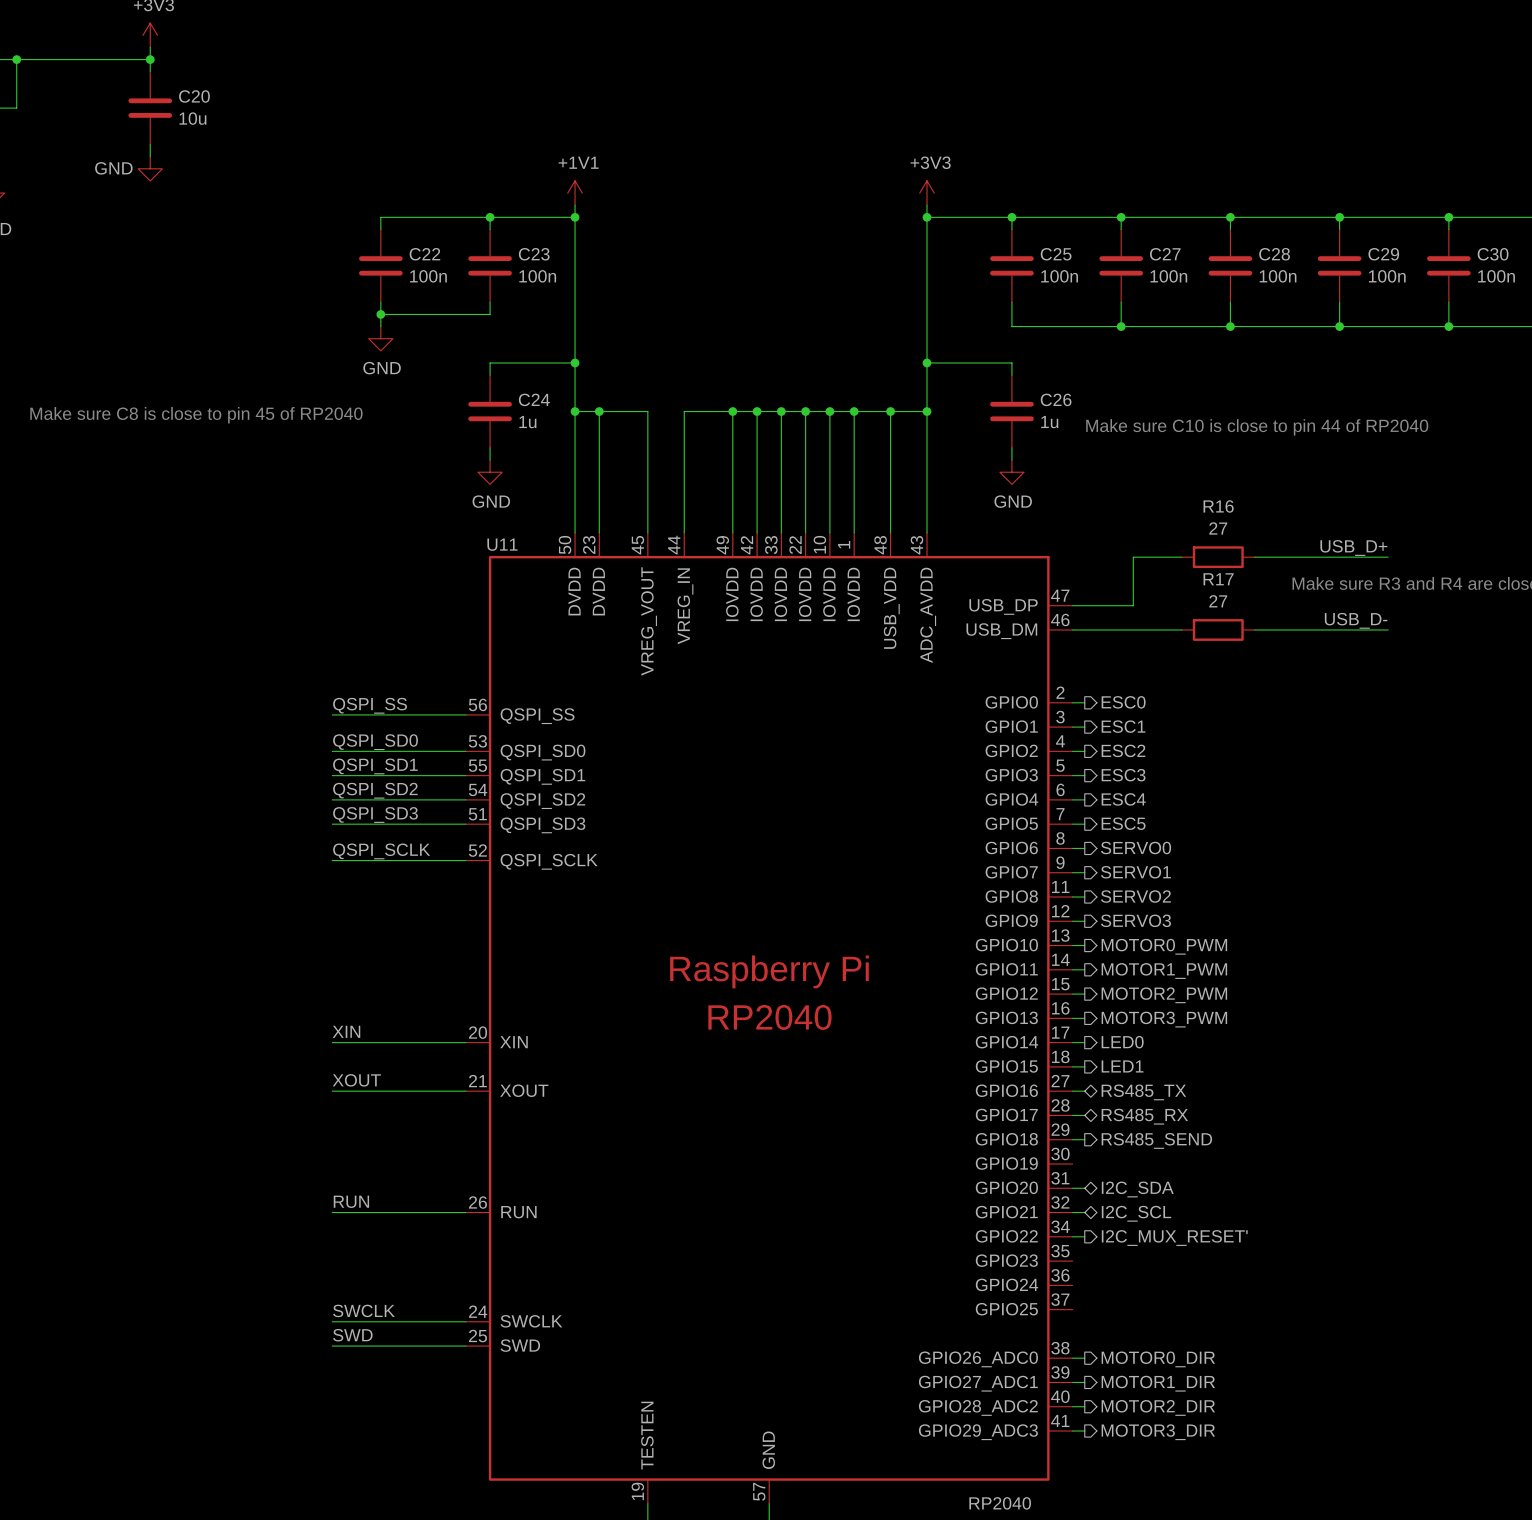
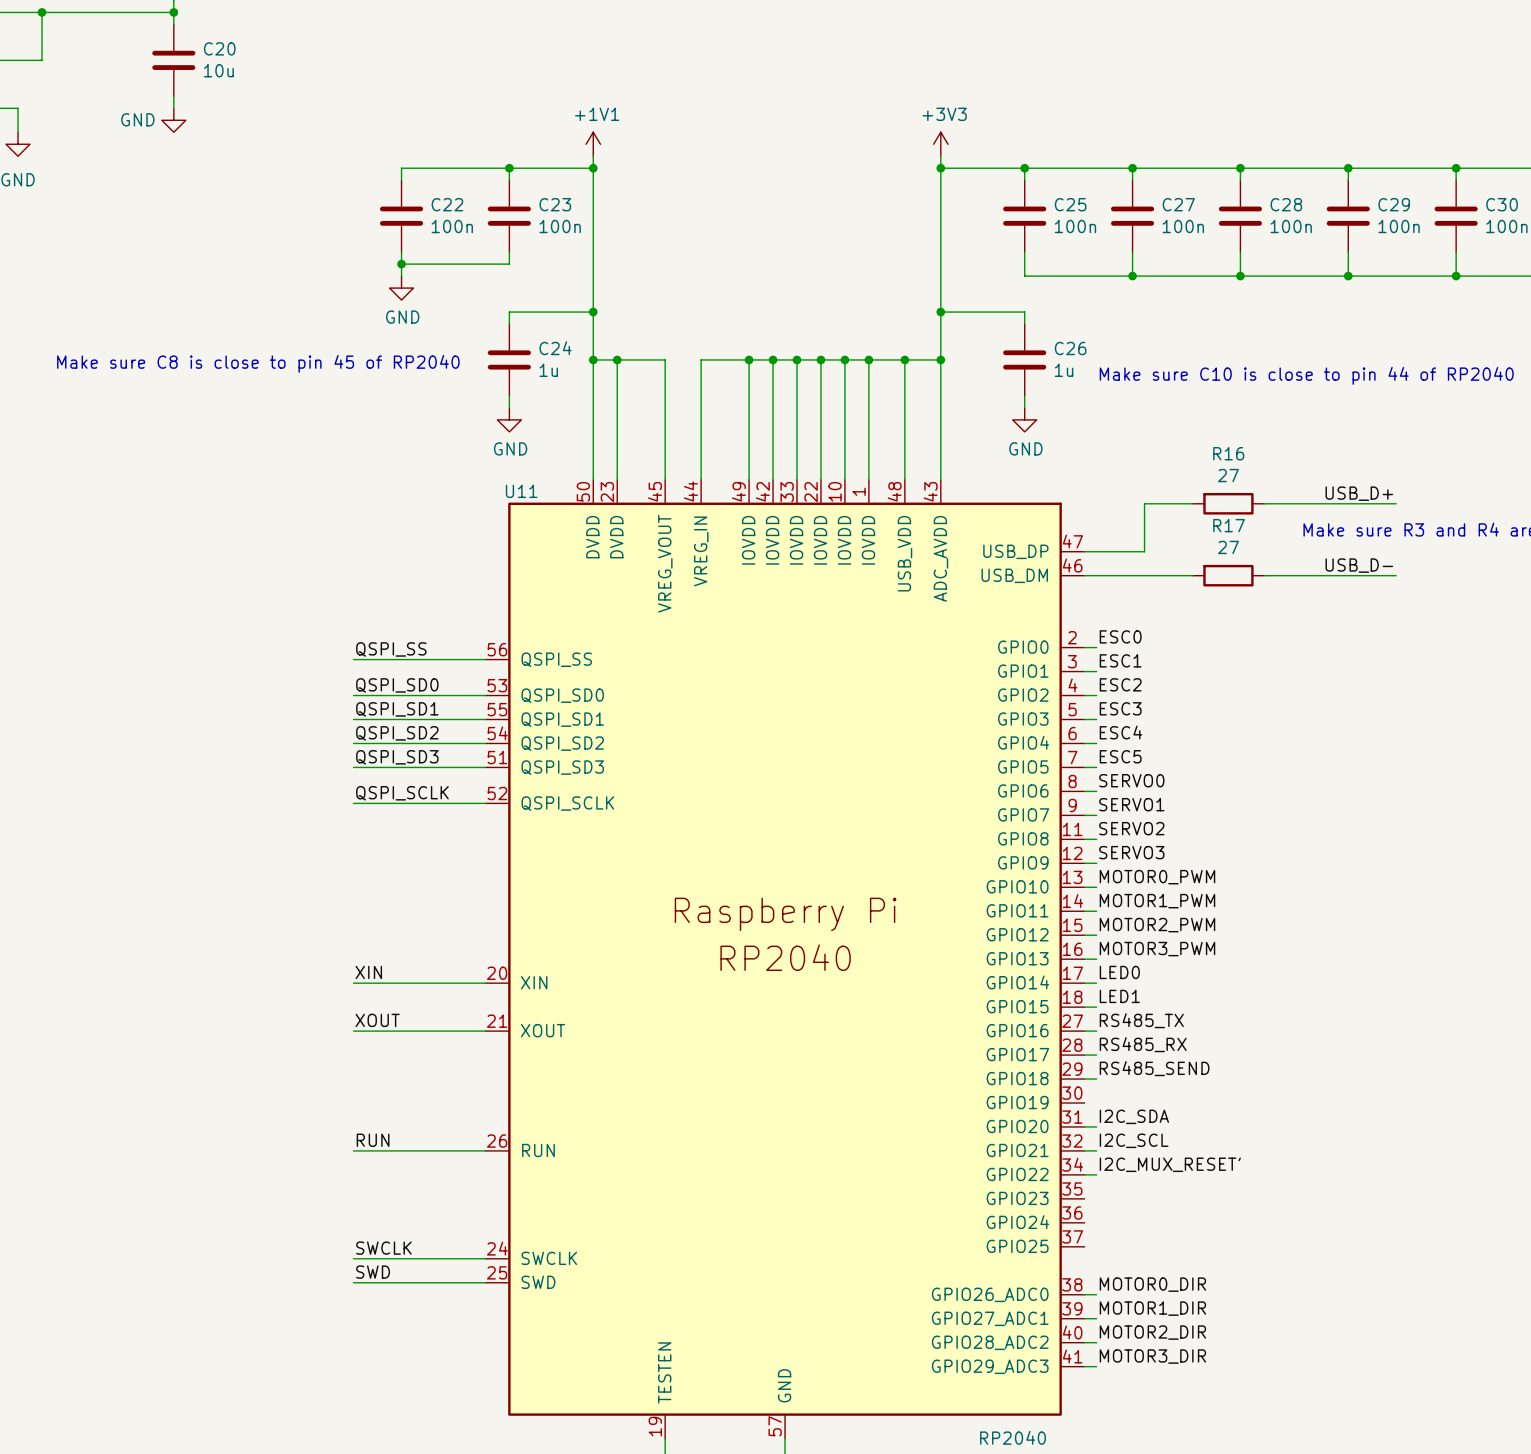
label: none -> ESC0 (1120, 636)
hierarchical label: ESC0 (1123, 702) -> none
label: none -> ESC1 (1120, 660)
hierarchical label: ESC1 (1123, 726) -> none
label: none -> ESC2 (1120, 684)
hierarchical label: ESC2 (1123, 750) -> none
label: none -> ESC3 (1120, 708)
hierarchical label: ESC3 (1123, 775) -> none
label: none -> ESC4 (1120, 732)
hierarchical label: ESC4 (1123, 799) -> none
label: none -> ESC5 (1120, 756)
hierarchical label: ESC5 (1123, 823) -> none
label: none -> SERVO0 (1131, 780)
hierarchical label: SERVO0 (1136, 847) -> none
label: none -> SERVO1 (1131, 804)
hierarchical label: SERVO1 (1135, 872) -> none
label: none -> SERVO2 (1131, 828)
hierarchical label: SERVO2 (1135, 896) -> none
label: none -> SERVO3 (1131, 852)
hierarchical label: SERVO3 (1135, 920) -> none
label: none -> MOTOR0_PWM (1157, 877)
hierarchical label: MOTOR0_PWM (1164, 946) -> none
label: none -> MOTOR1_PWM (1157, 901)
hierarchical label: MOTOR1_PWM (1164, 971) -> none
label: none -> MOTOR2_PWM (1157, 925)
hierarchical label: MOTOR2_PWM (1164, 995) -> none
label: none -> MOTOR3_PWM (1157, 949)
hierarchical label: MOTOR3_PWM (1164, 1019) -> none
label: none -> LED0 (1119, 972)
hierarchical label: LED0 (1122, 1042) -> none
label: none -> LED1 (1119, 996)
hierarchical label: LED1 (1122, 1066) -> none
label: none -> RS485_TX (1141, 1020)
hierarchical label: RS485_TX (1143, 1092) -> none
label: none -> RS485_RX (1143, 1044)
hierarchical label: RS485_RX (1144, 1116) -> none
label: none -> RS485_SEND (1154, 1068)
hierarchical label: RS485_SEND (1156, 1140) -> none
label: none -> I2C_SDA (1134, 1116)
hierarchical label: I2C_SDA (1137, 1189) -> none
label: none -> I2C_SCL (1134, 1140)
hierarchical label: I2C_SCL (1136, 1213) -> none
label: none -> I2C_MUX_RESET' (1170, 1164)
hierarchical label: I2C_MUX_RESET' (1174, 1238) -> none
label: none -> MOTOR0_DIR (1152, 1284)
hierarchical label: MOTOR0_DIR (1158, 1359) -> none
label: none -> MOTOR1_DIR (1152, 1308)
hierarchical label: MOTOR1_DIR (1158, 1383) -> none
label: none -> MOTOR2_DIR (1152, 1332)
hierarchical label: MOTOR2_DIR (1158, 1407) -> none
label: none -> MOTOR3_DIR (1152, 1356)
hierarchical label: MOTOR3_DIR (1158, 1432) -> none

